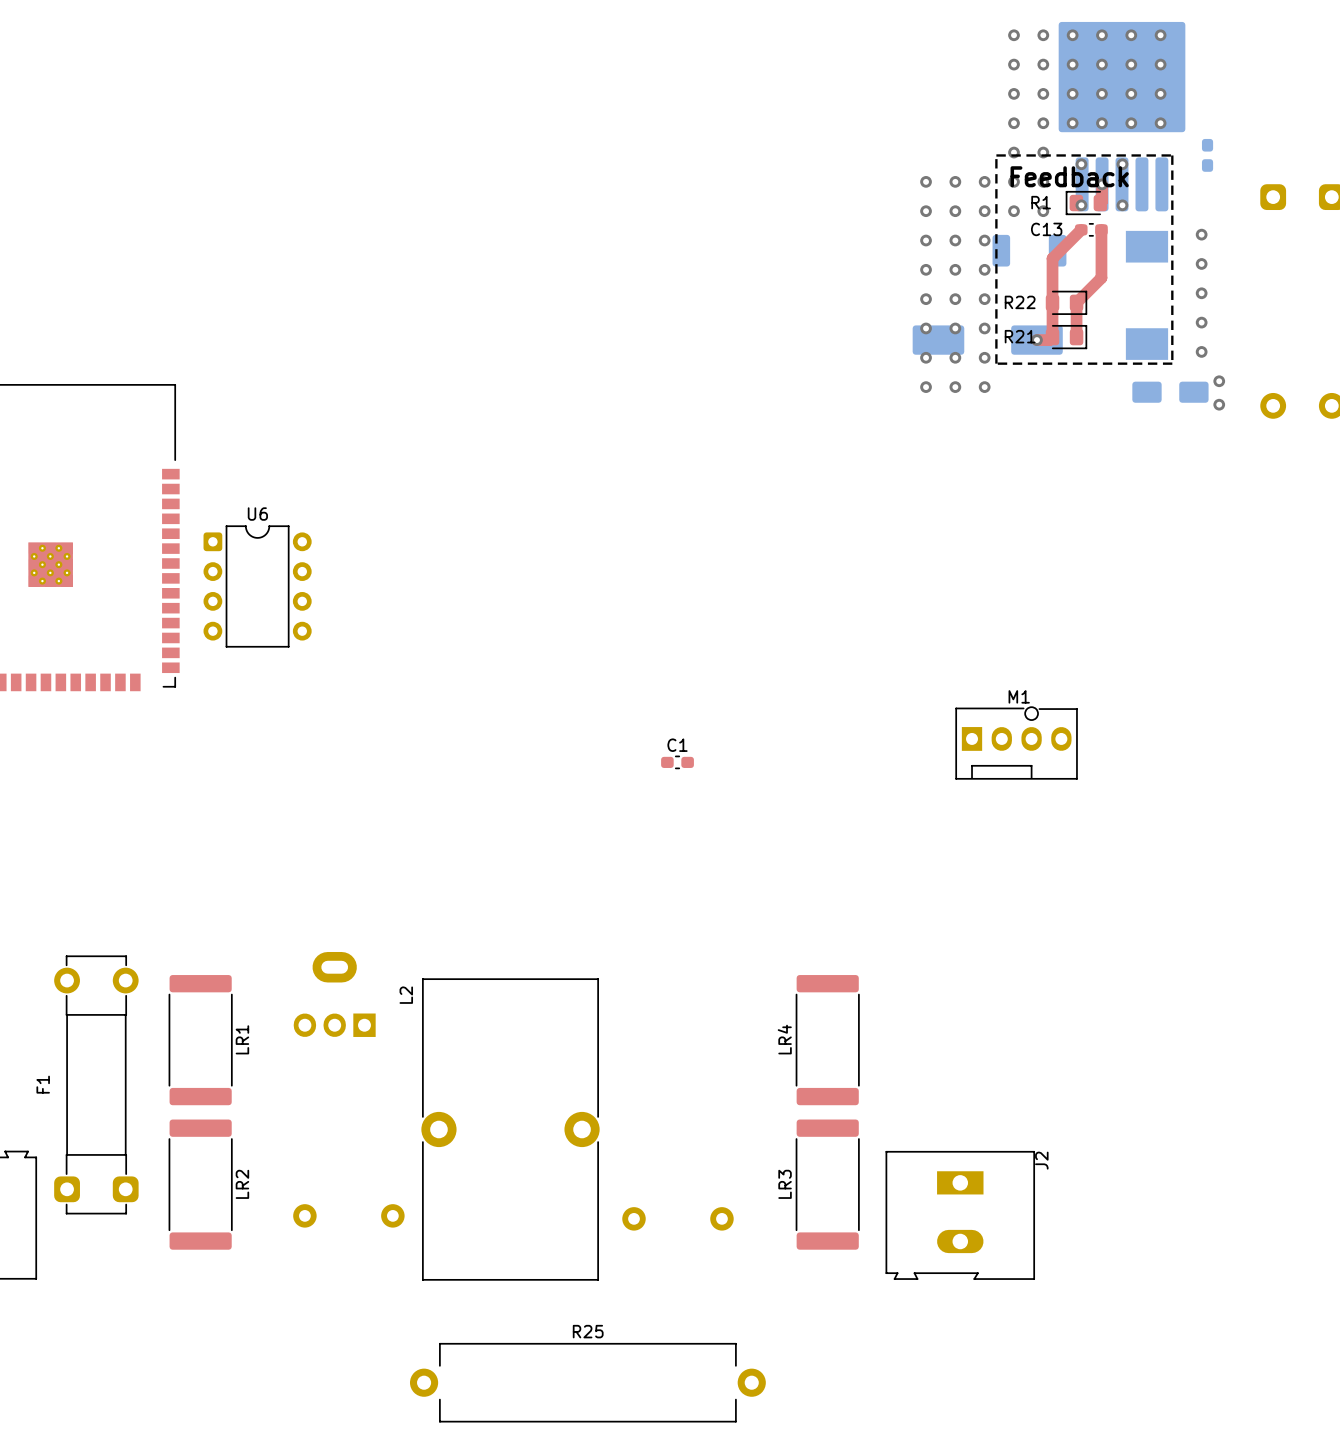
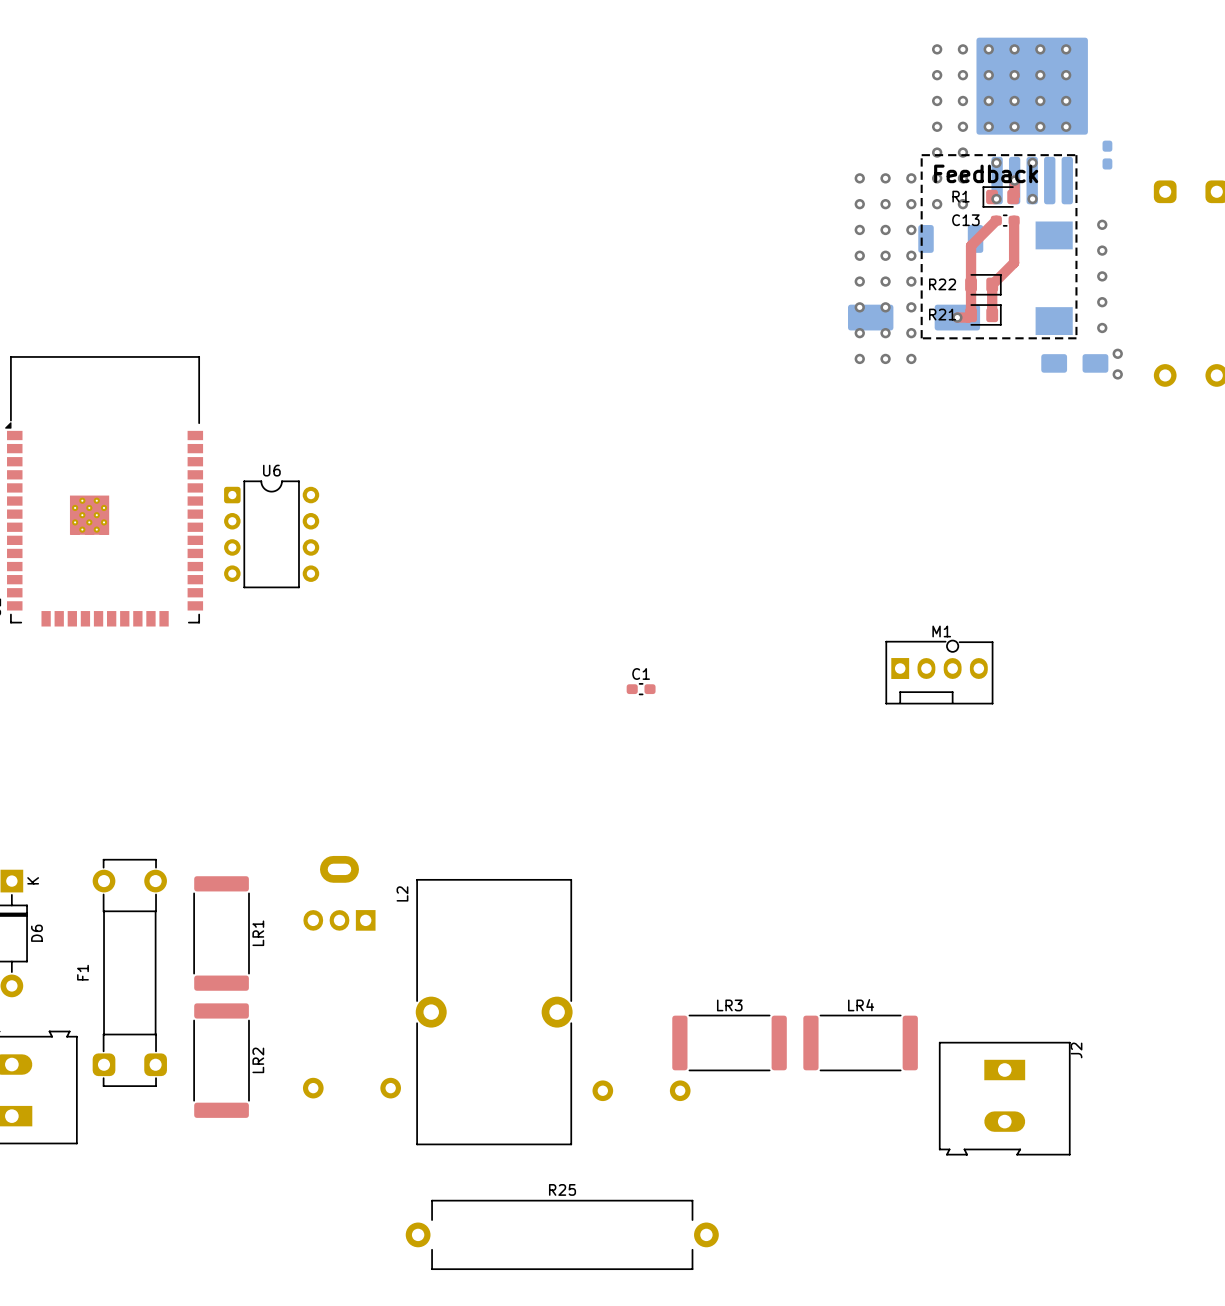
LR4 rotation: 0° (827, 1040) -> 90° clockwise (860, 1042)
LR4 position: (827, 1040) -> (860, 1042)
LR3 rotation: 0° (827, 1184) -> 90° clockwise (729, 1042)
J2 position: (960, 1215) -> (1004, 1098)

